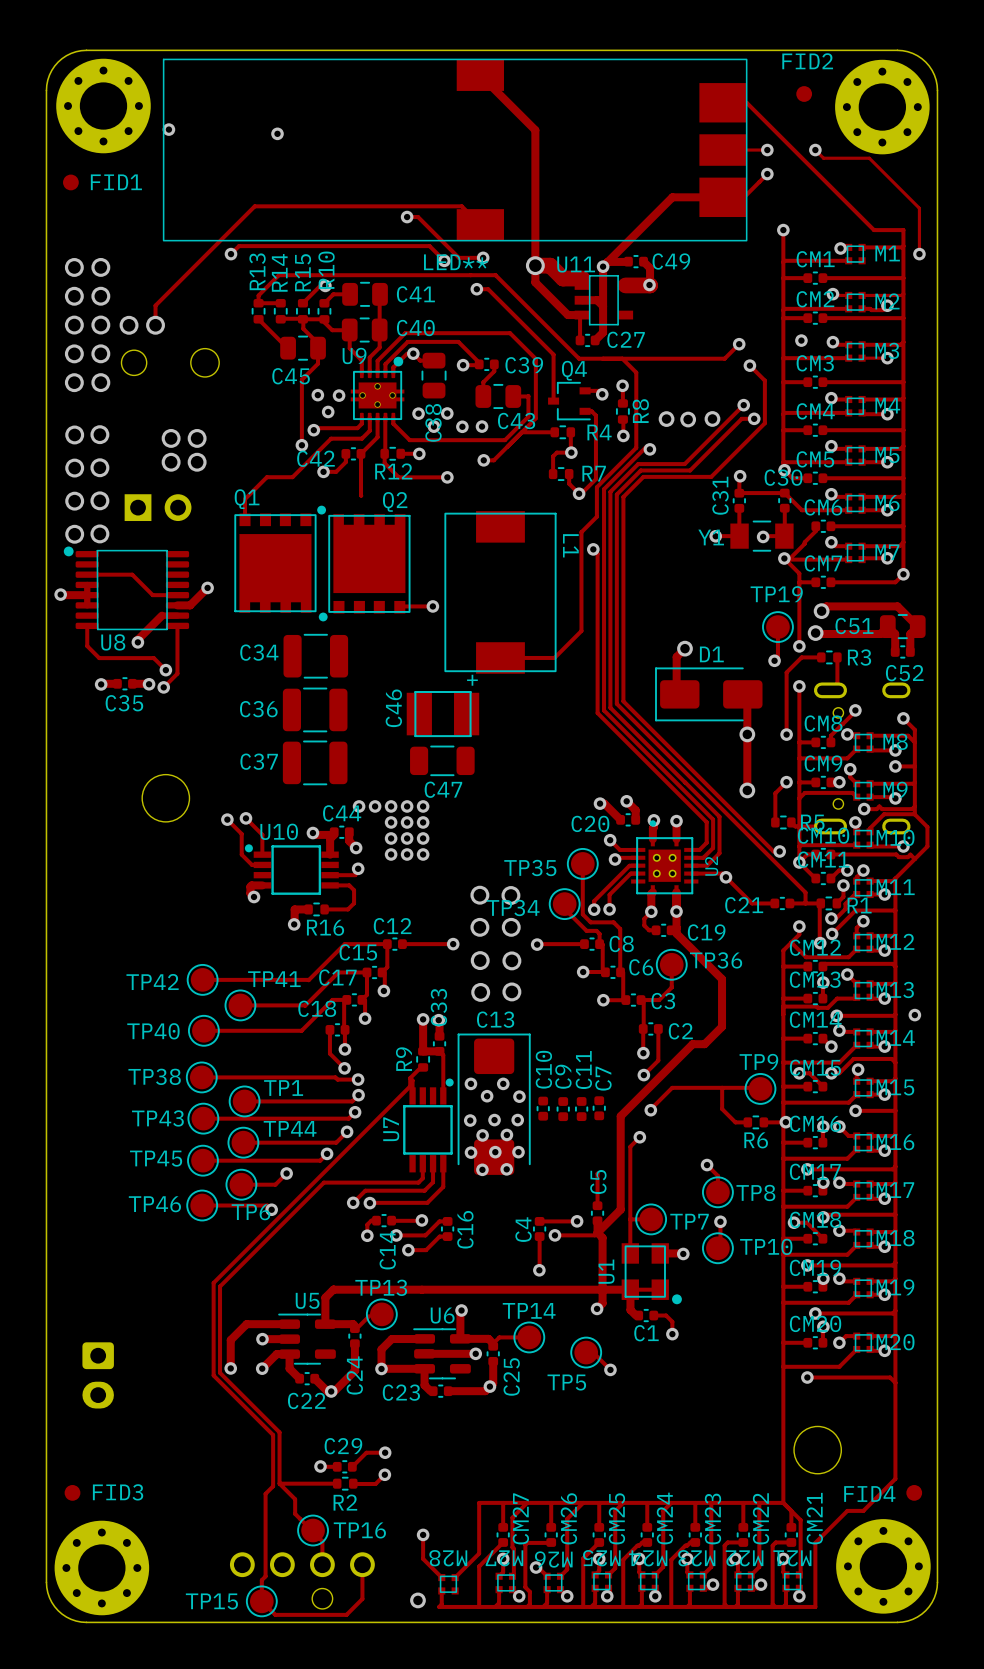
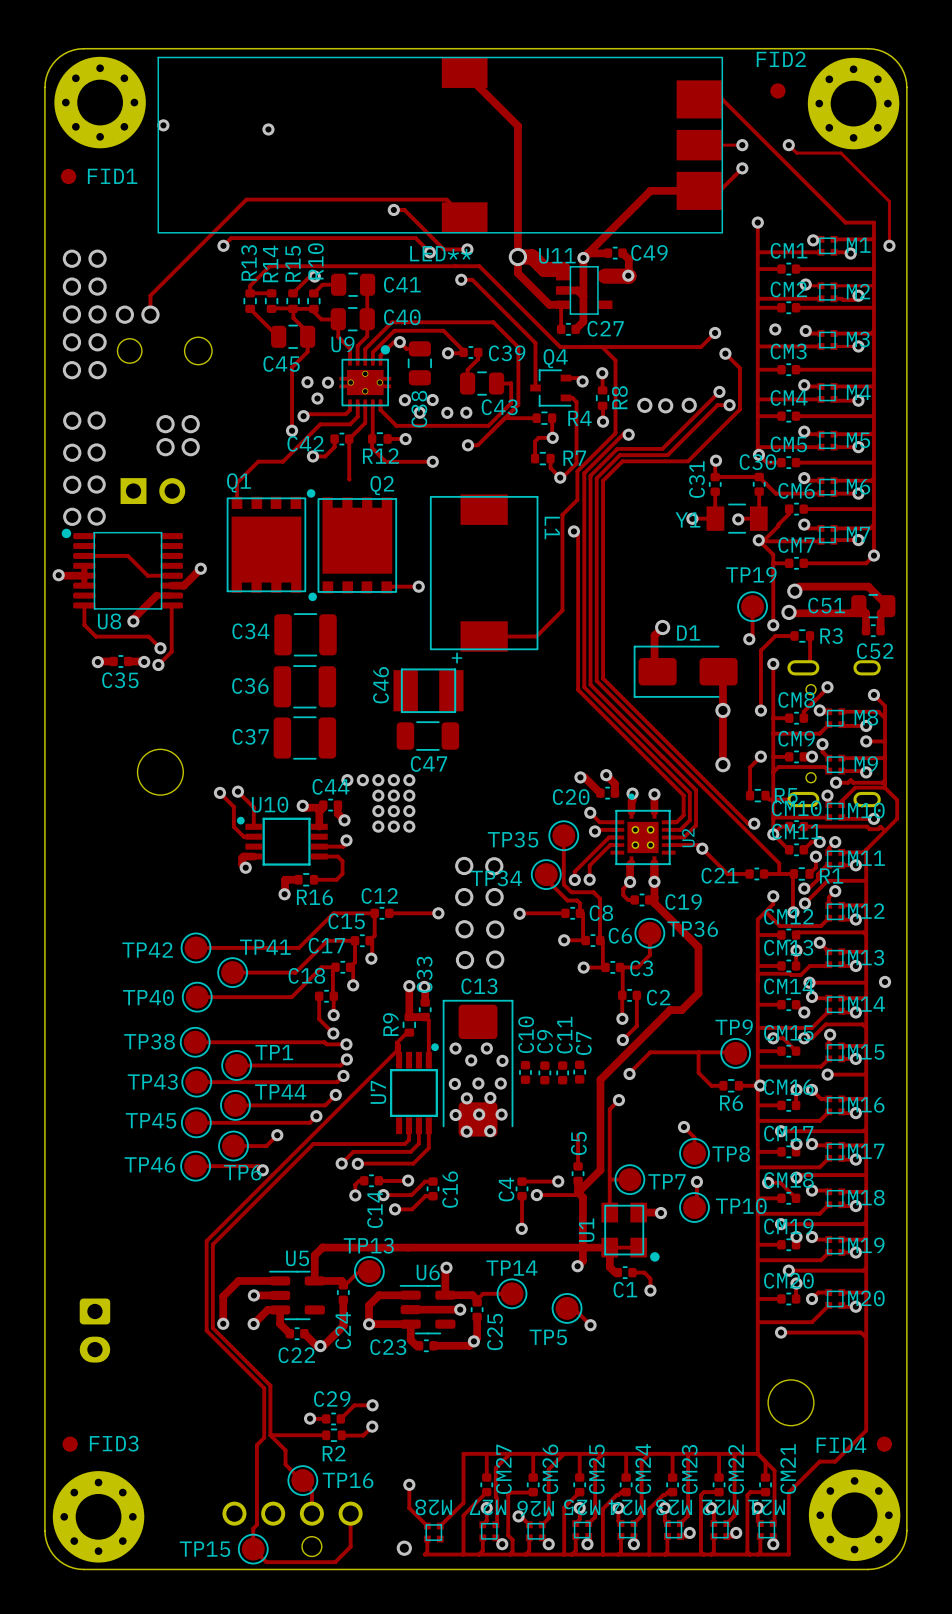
track: none -> (833, 252) (850, 253)
via: none -> (850, 253)

